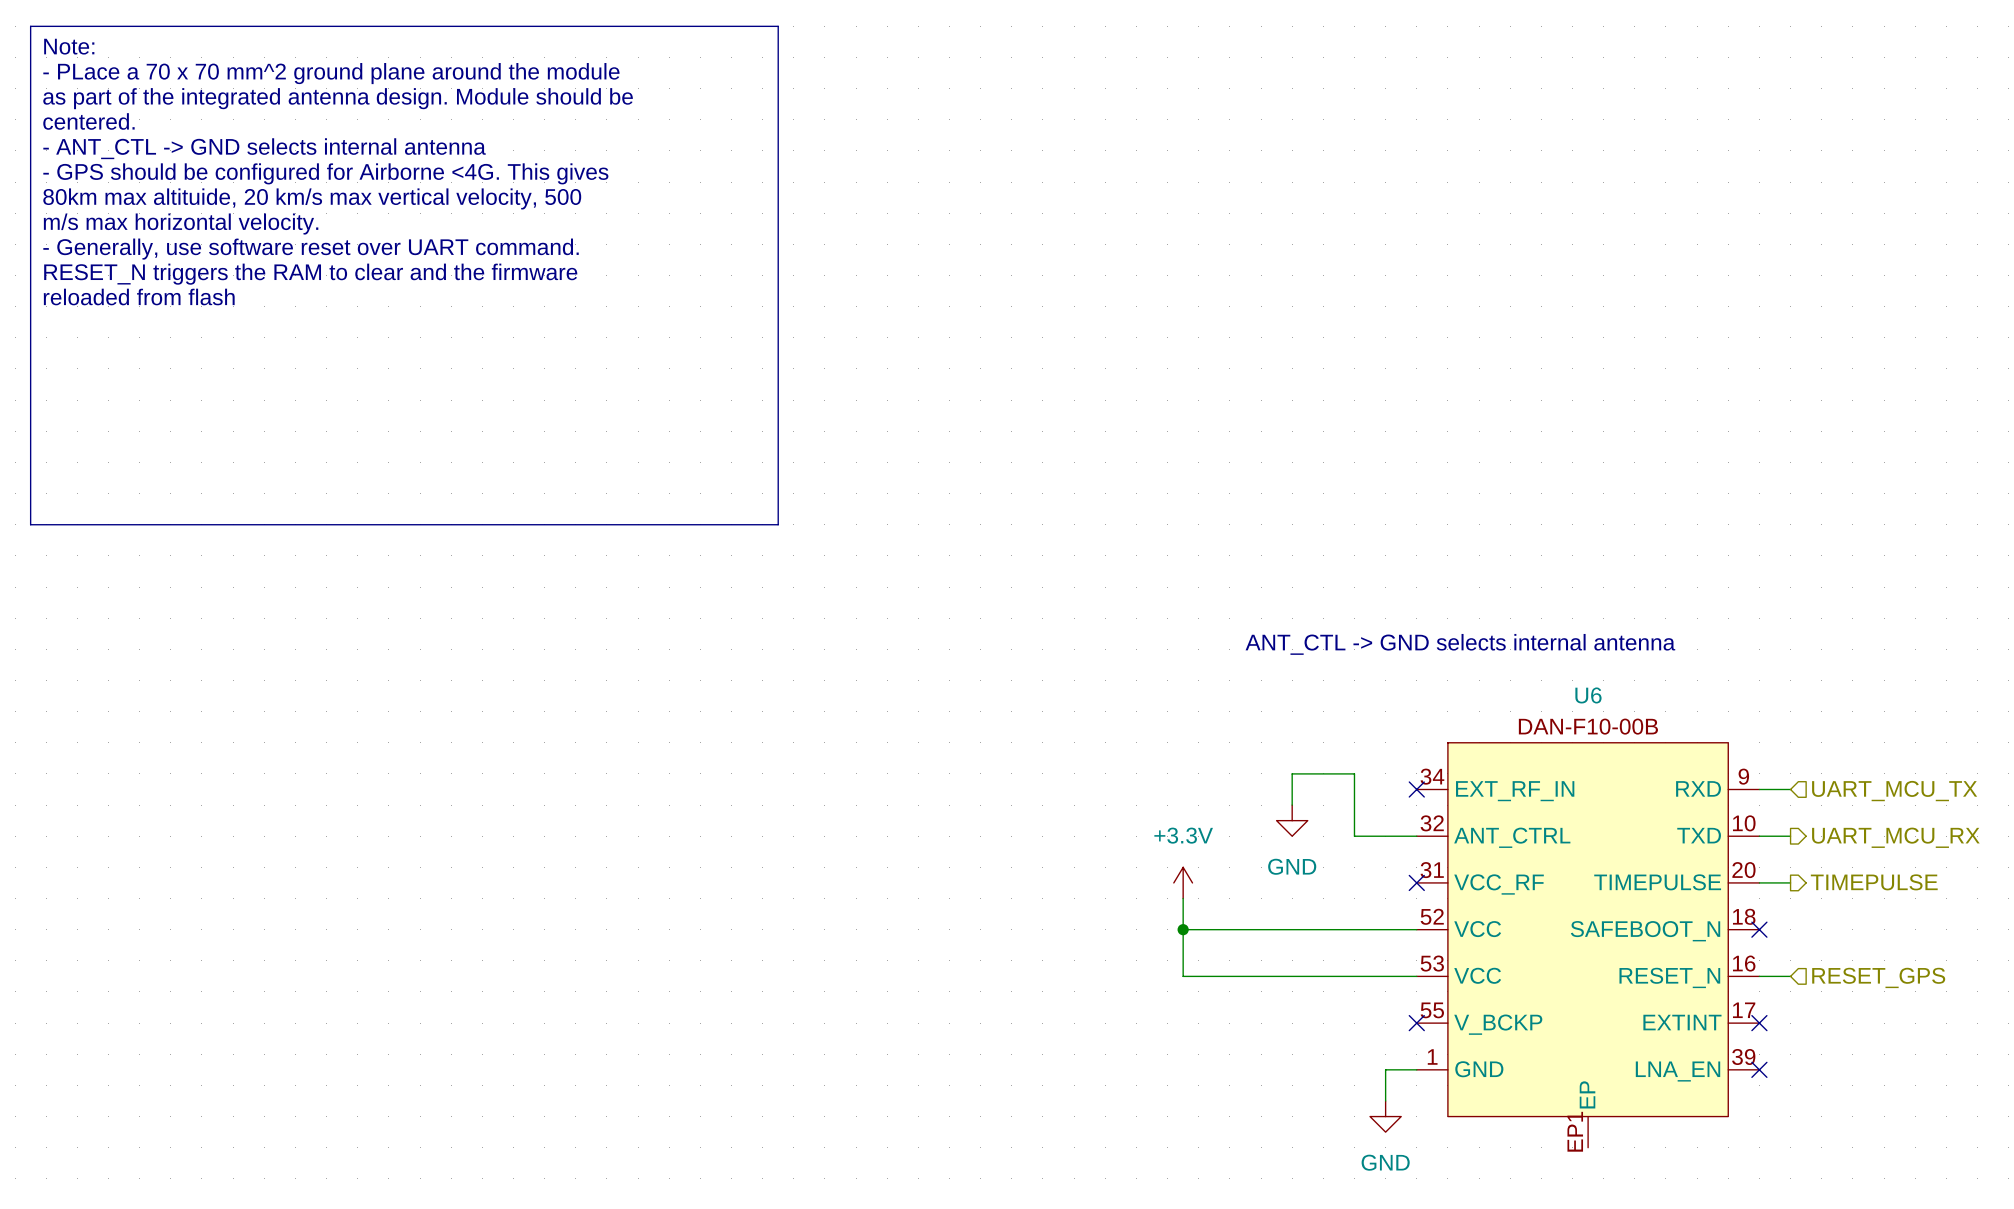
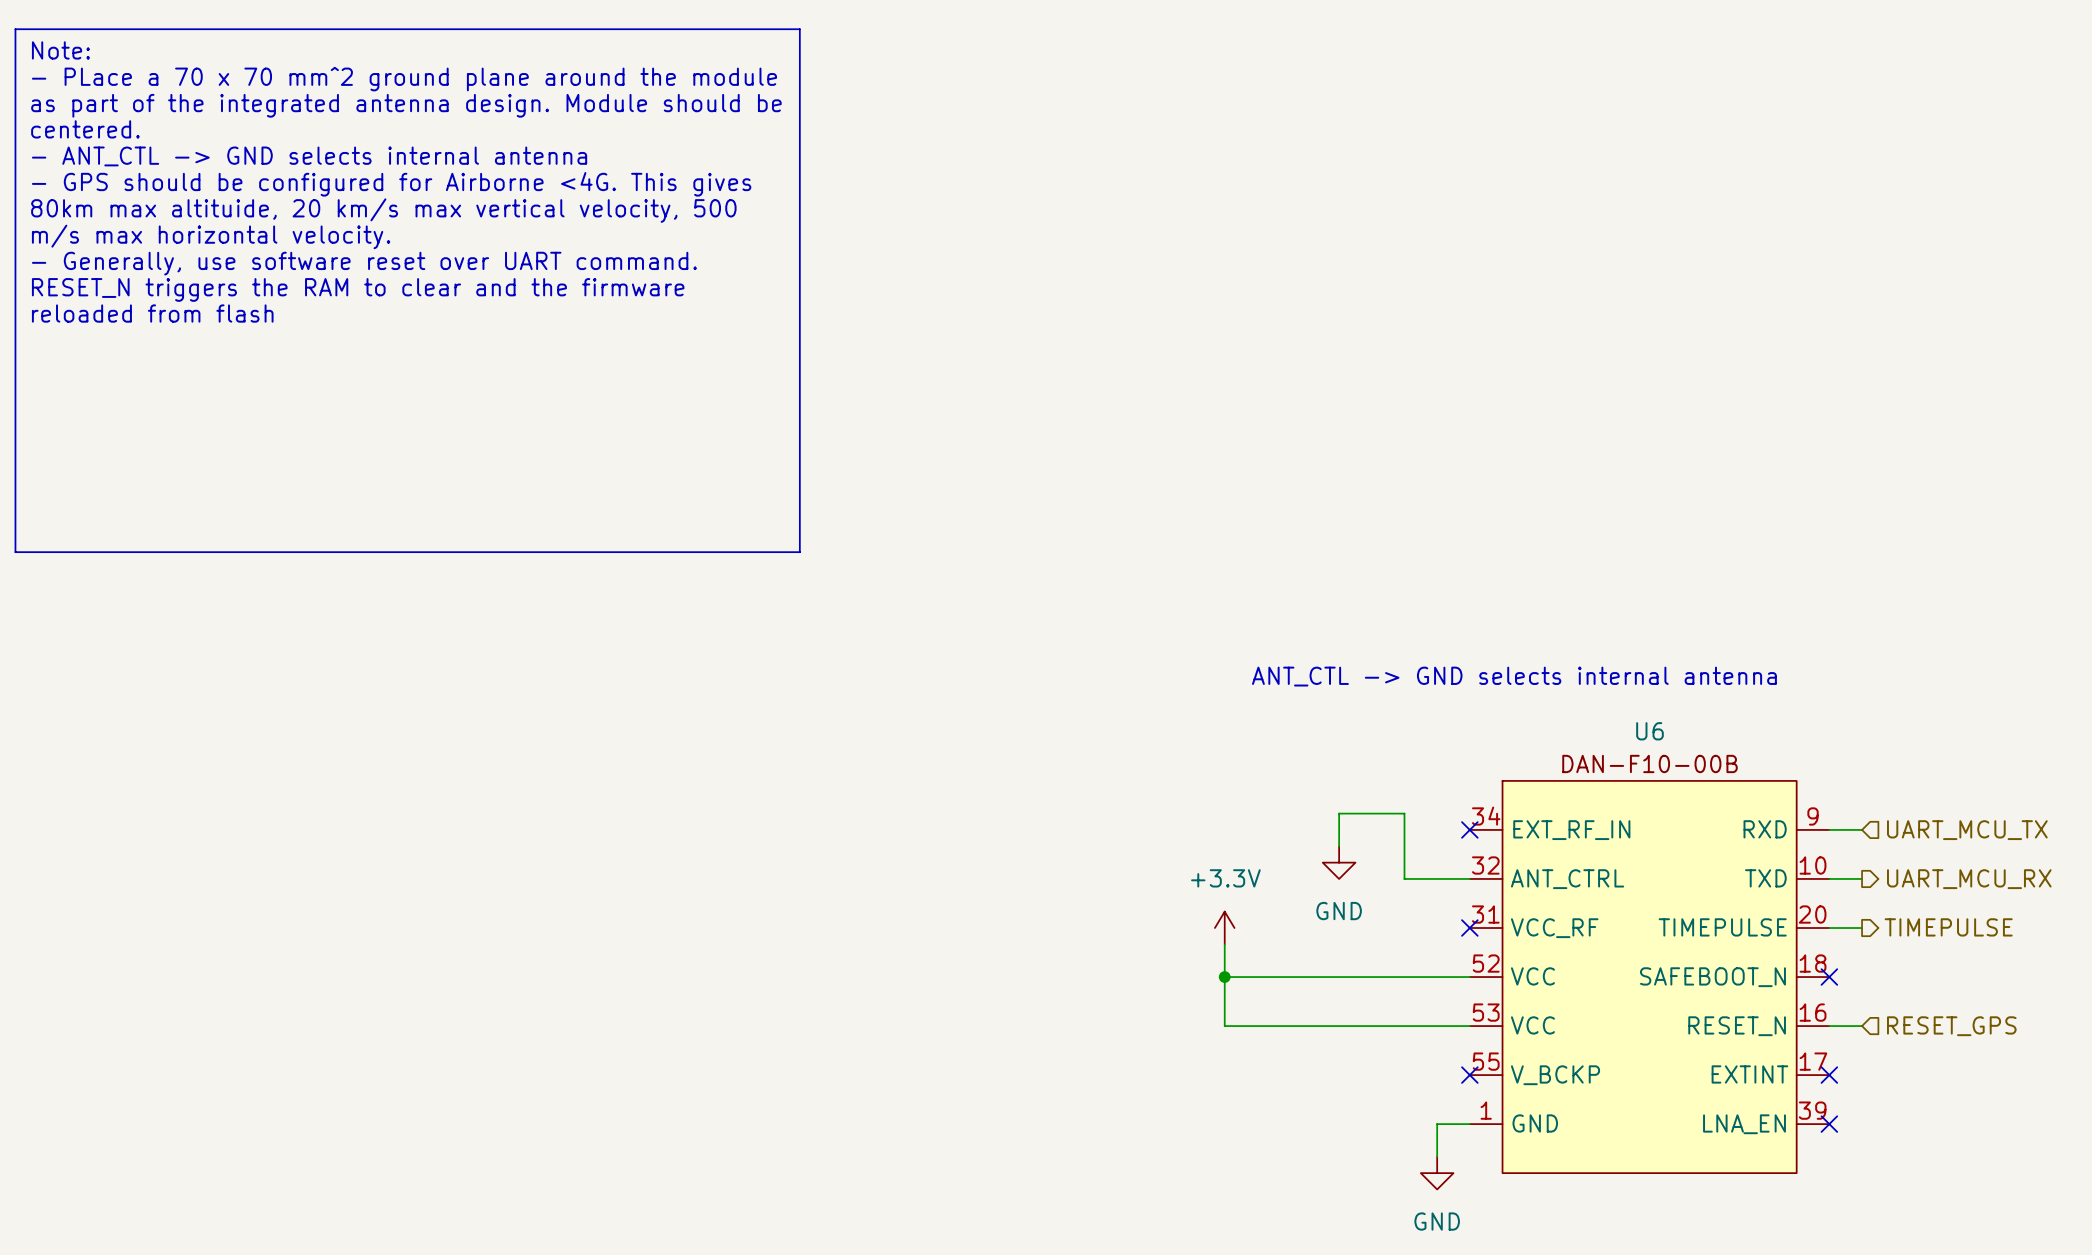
U6 symbol: [1416, 742, 1760, 1148] -> [1469, 780, 1830, 1174]

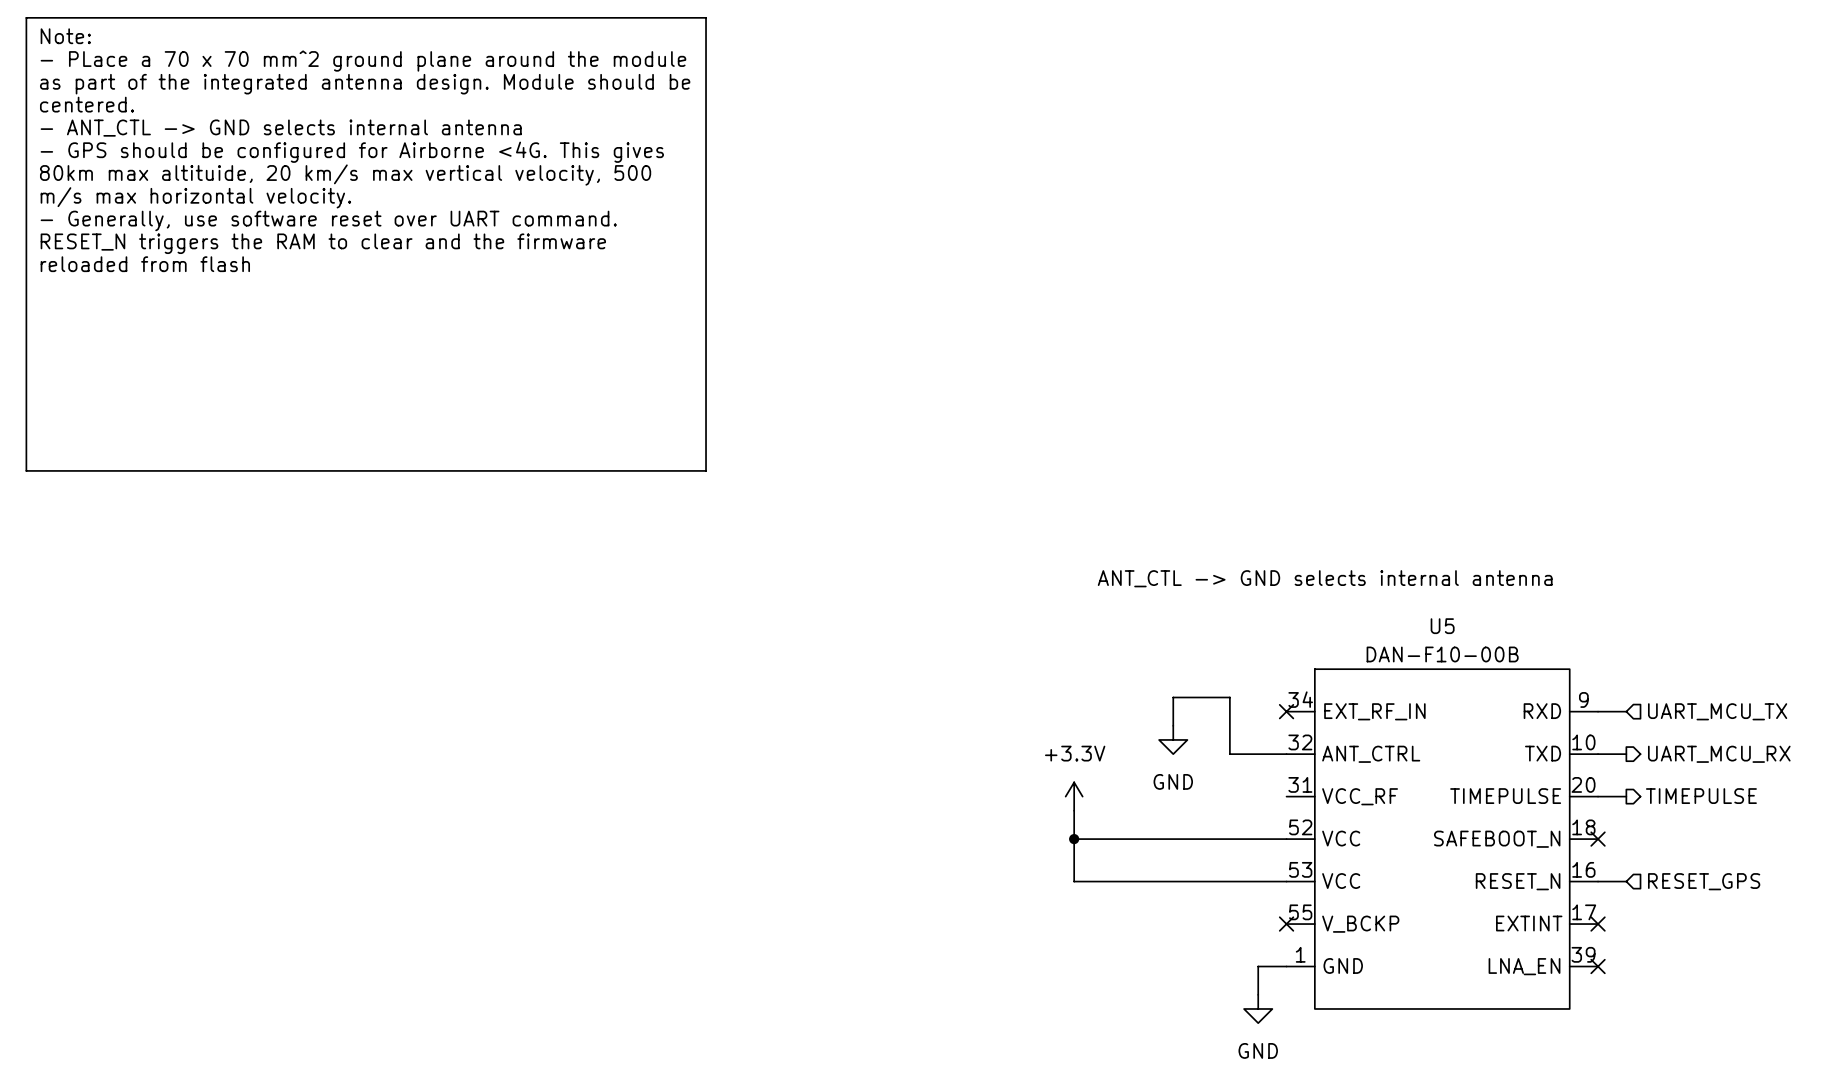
U6 name: U6 (1649, 731) -> U5 (1442, 626)
no-connect mark: (1469, 928) -> none

